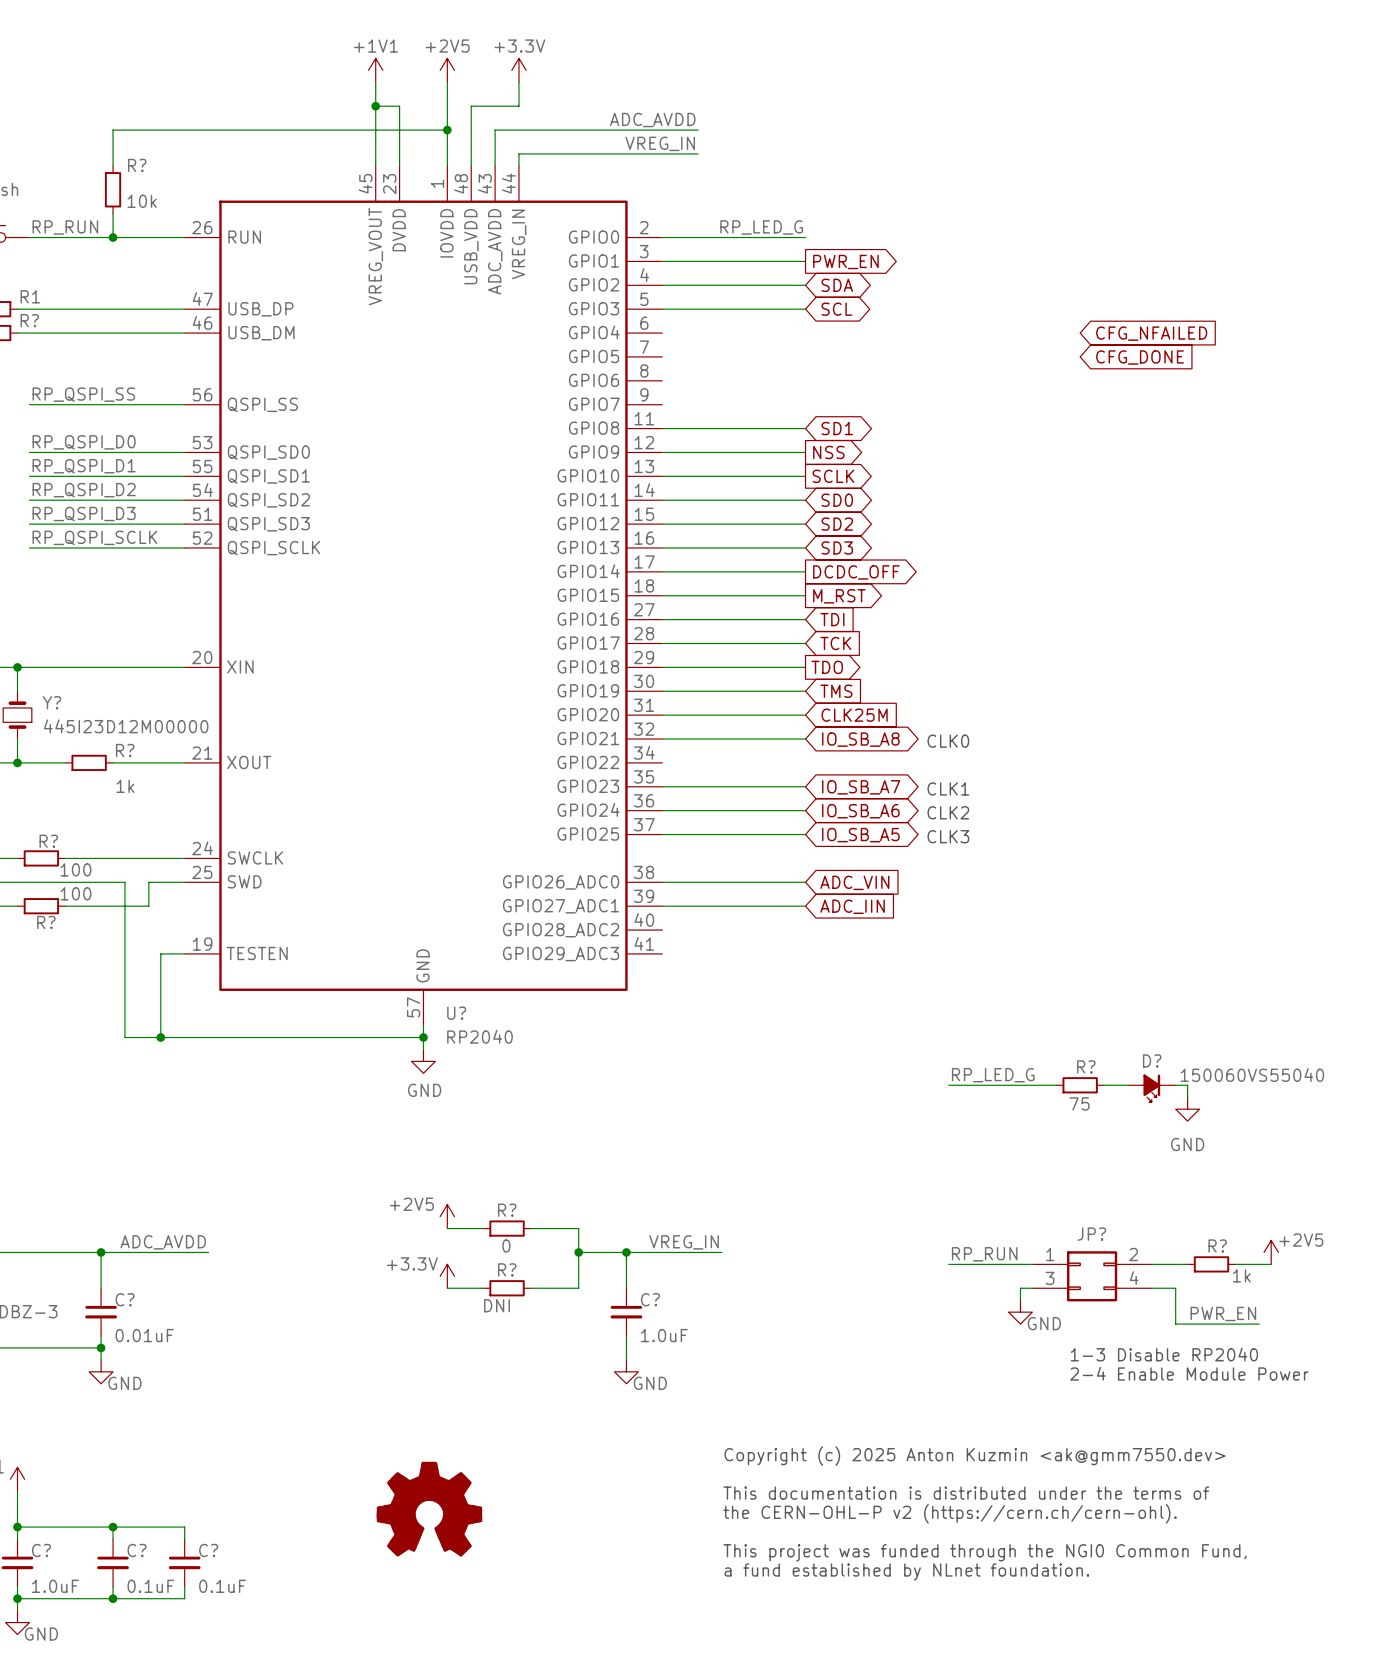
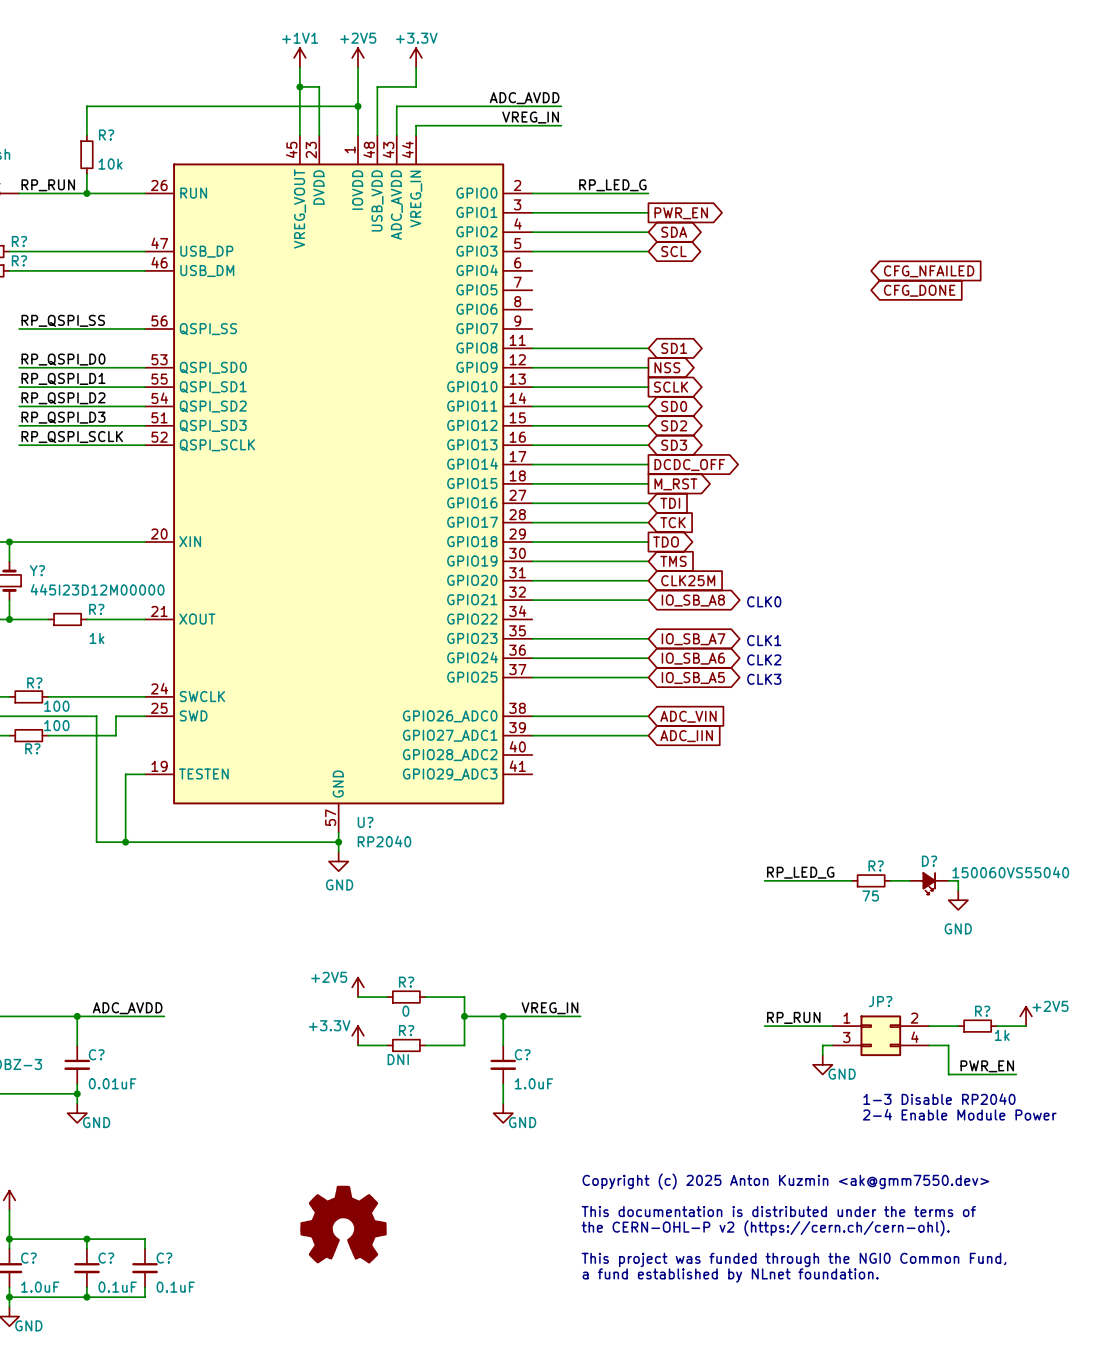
R1 name: R1 (30, 296) -> R? (19, 241)

